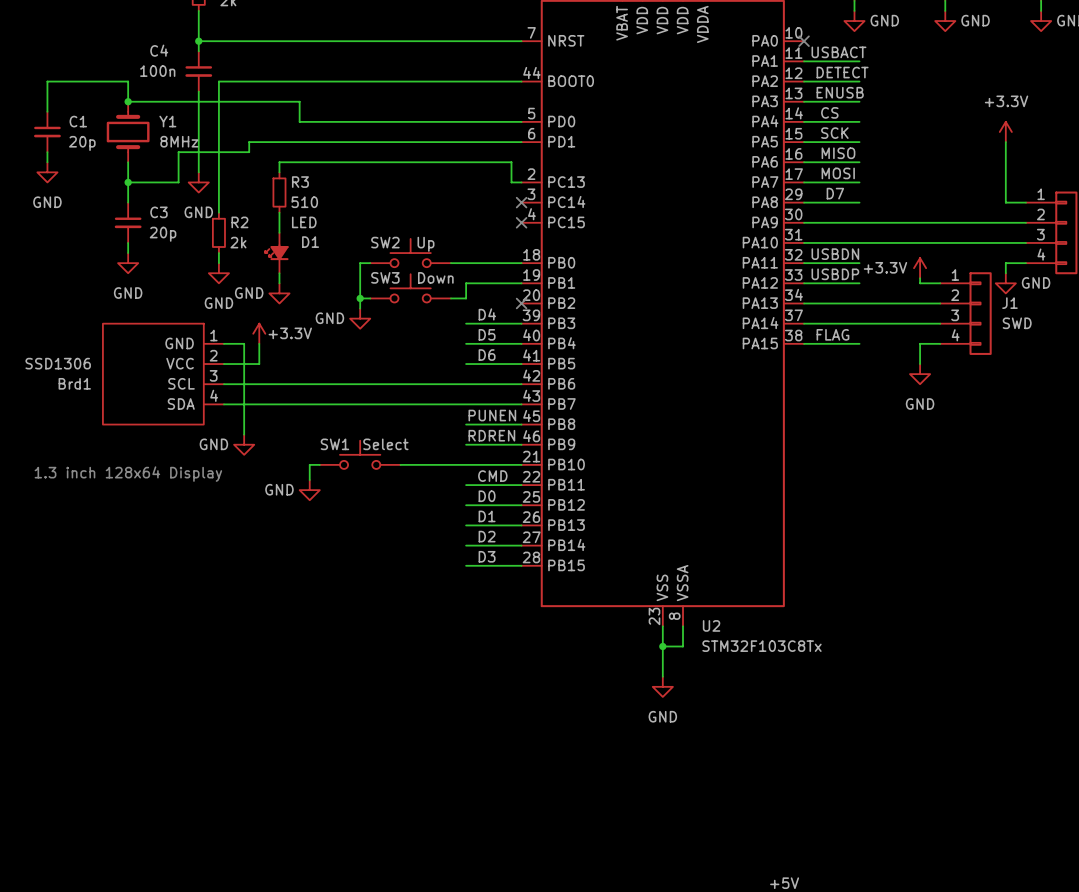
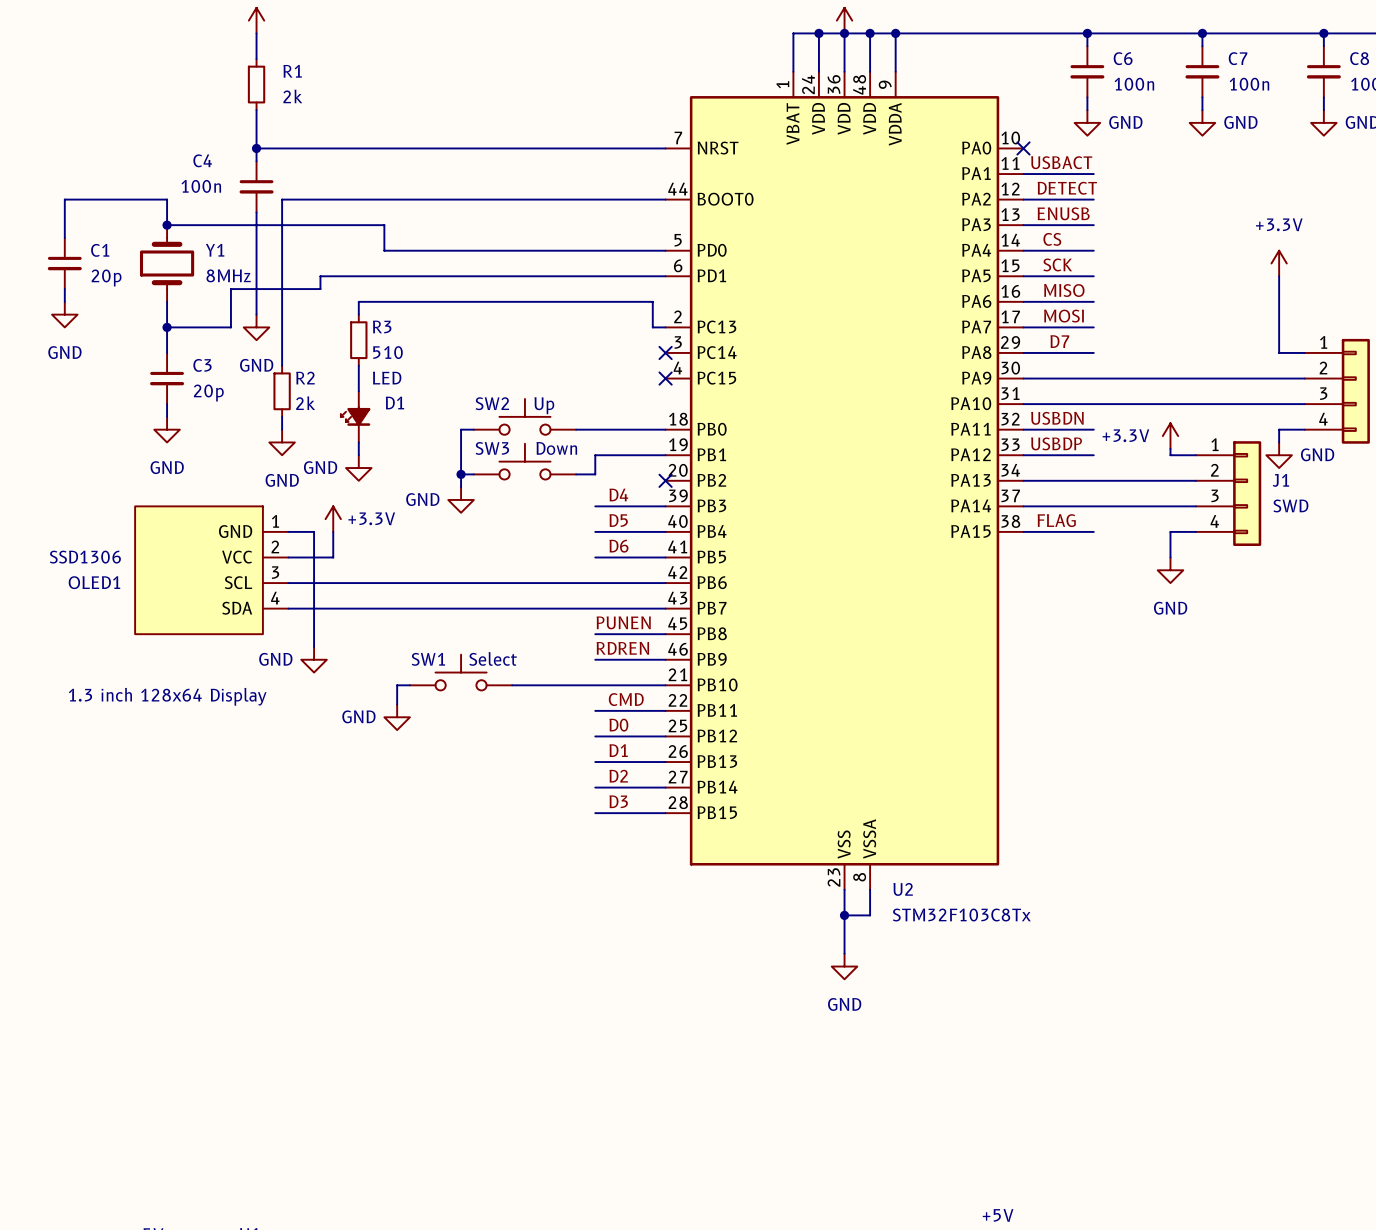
Brd1 name: Brd1 (74, 383) -> OLED1 (94, 582)

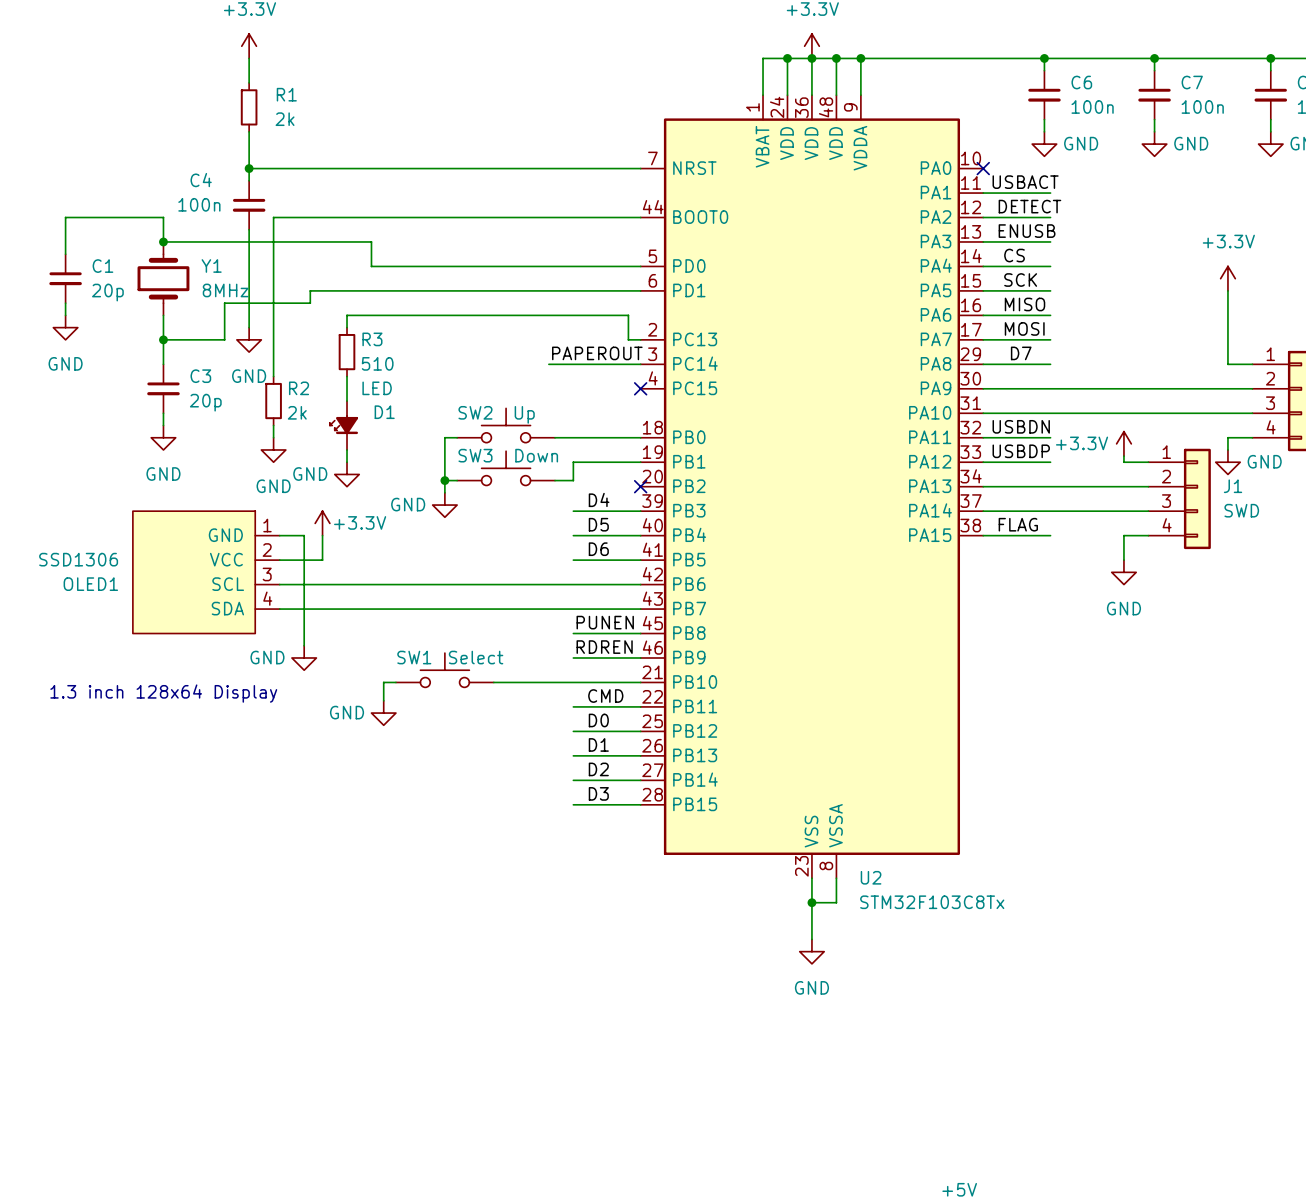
label: none -> PAPEROUT (597, 353)
wire: none -> (548, 364) (640, 364)
no-connect mark: (665, 352) -> none

